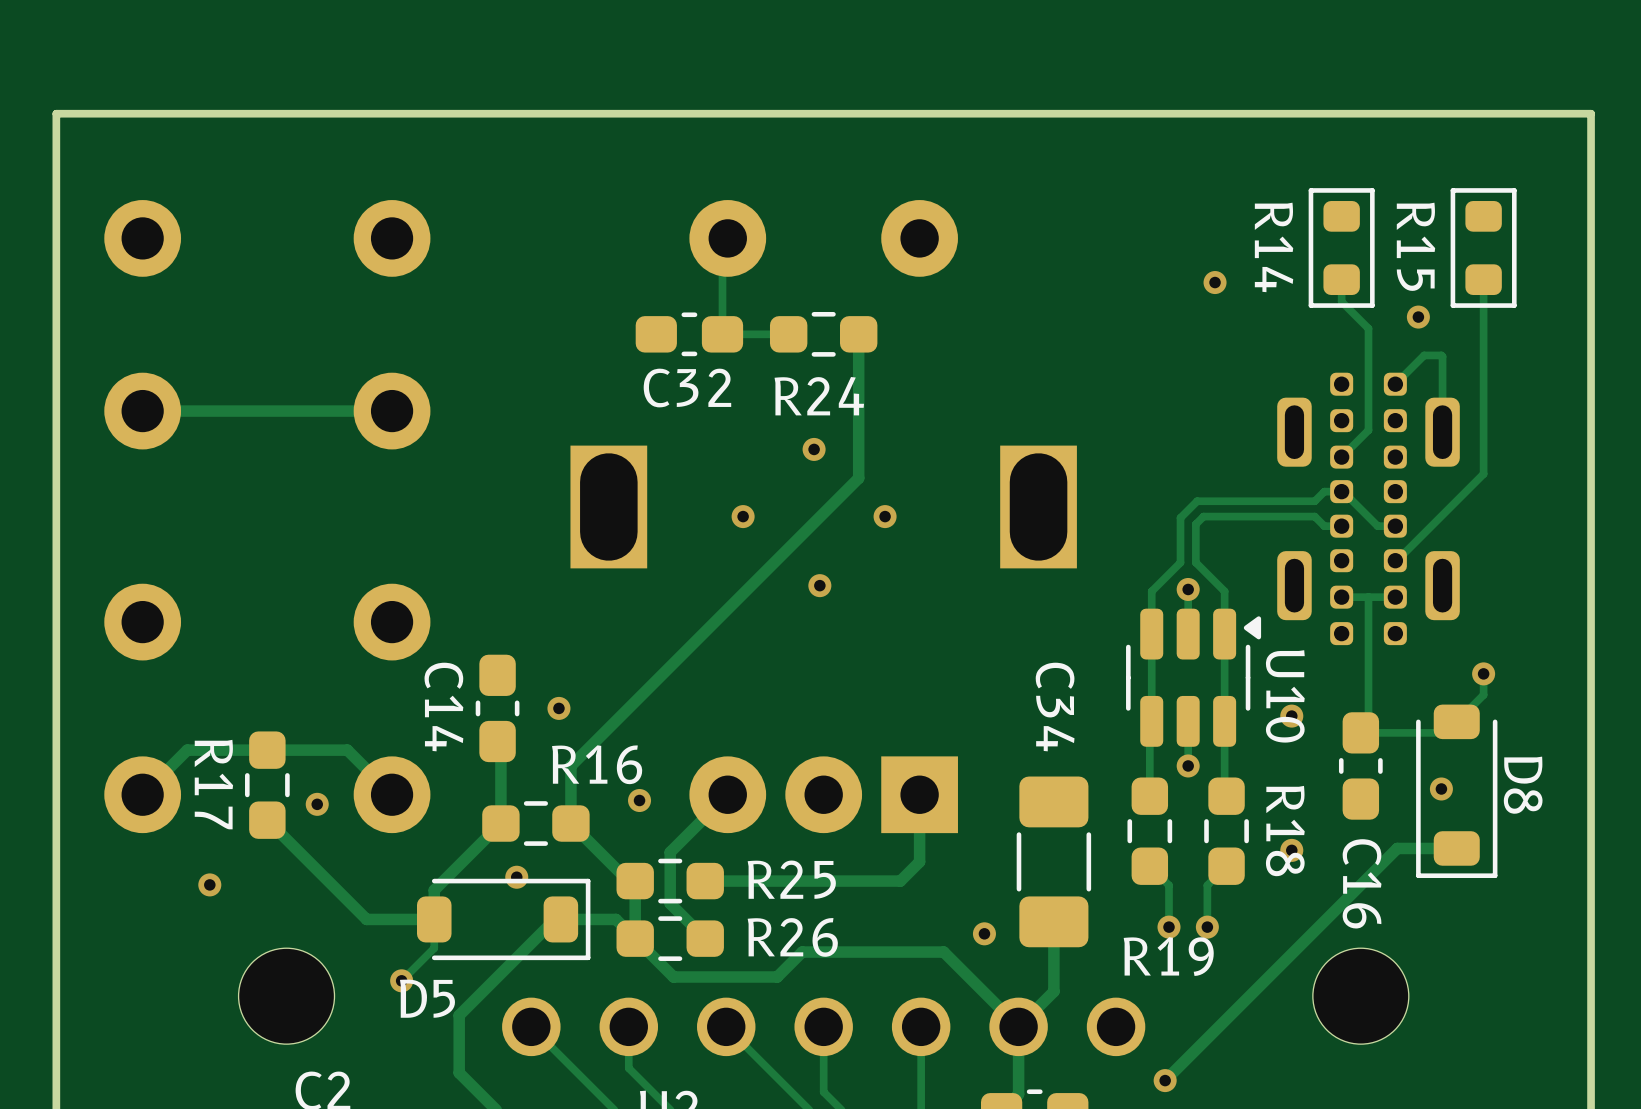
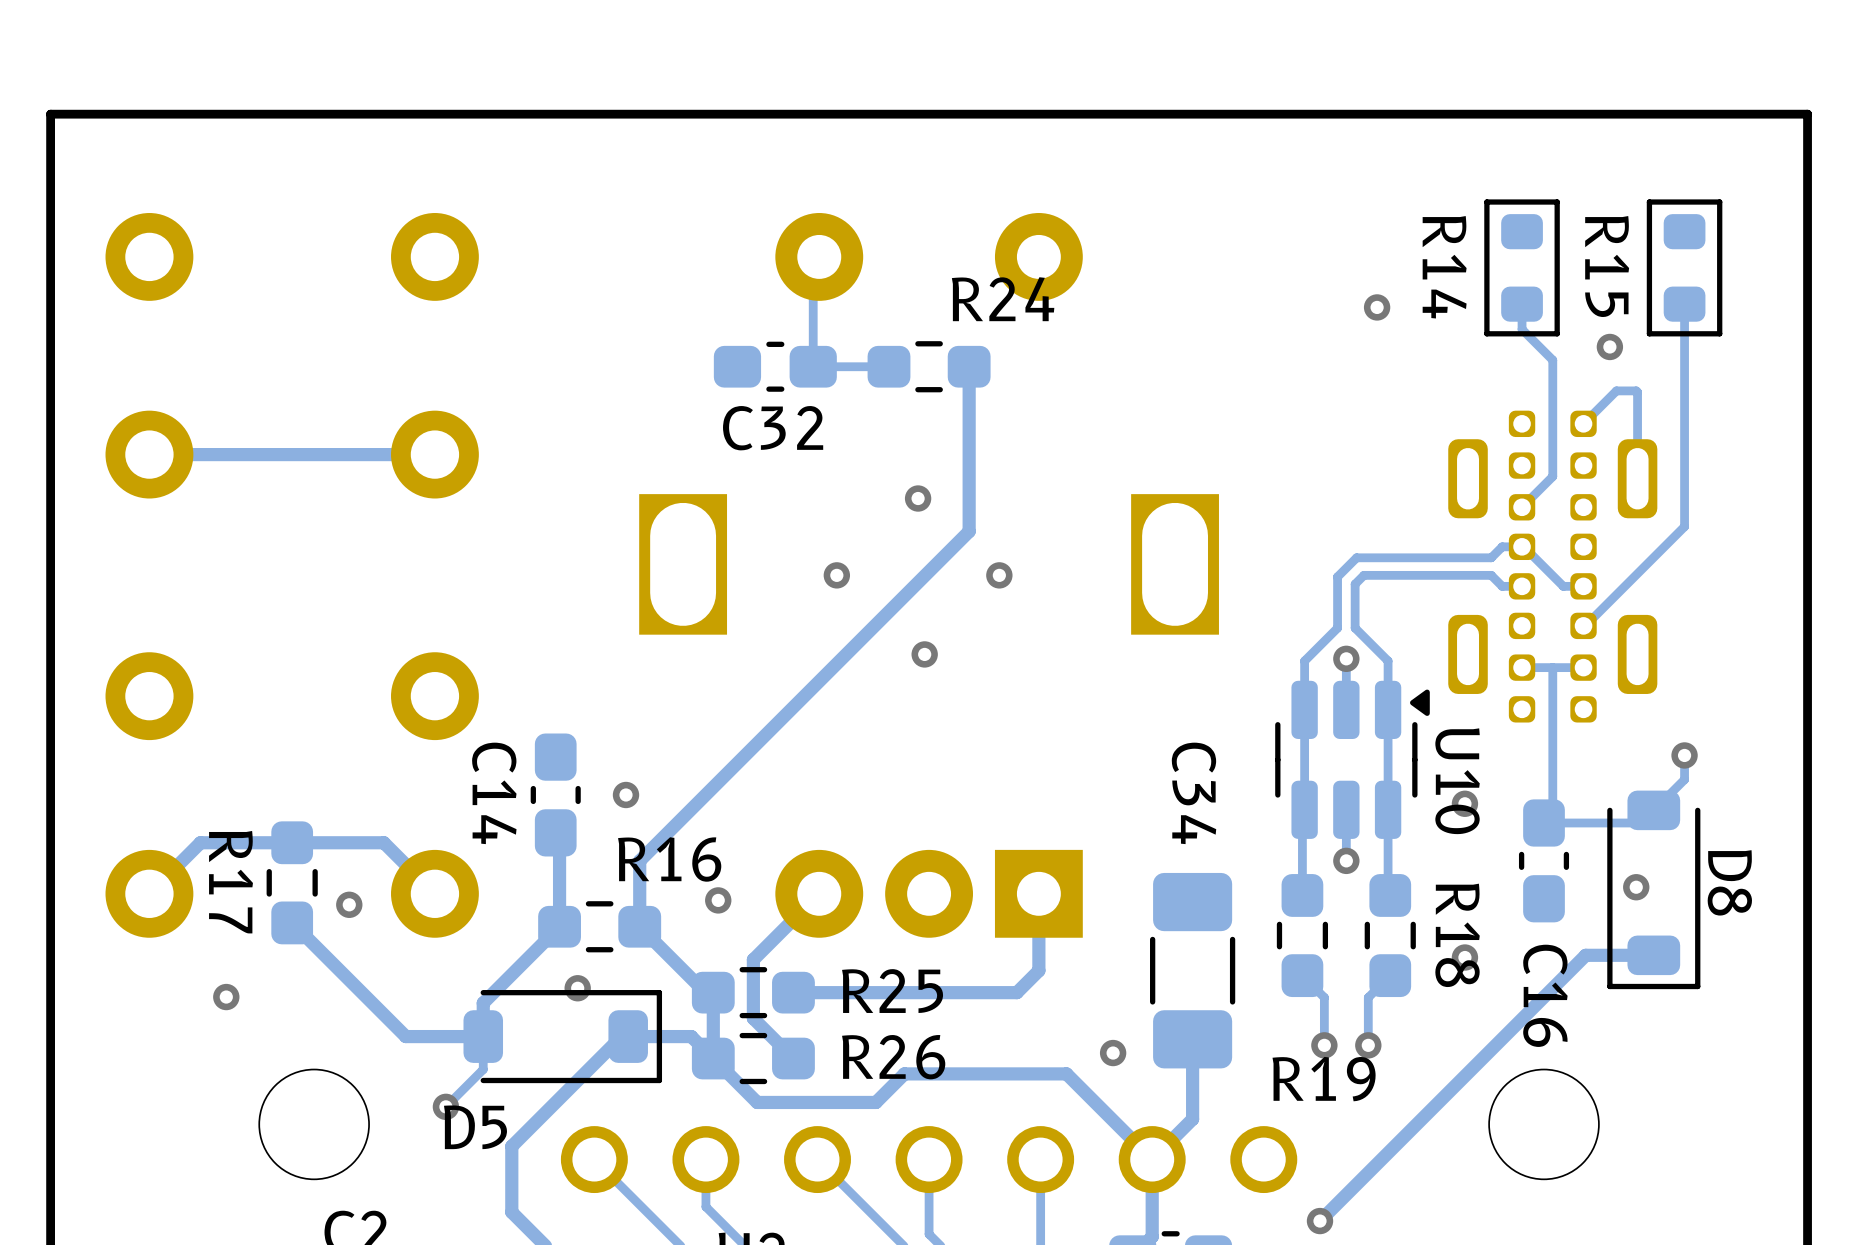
R24 name position: R24 (819, 396) -> R24 (1003, 299)

